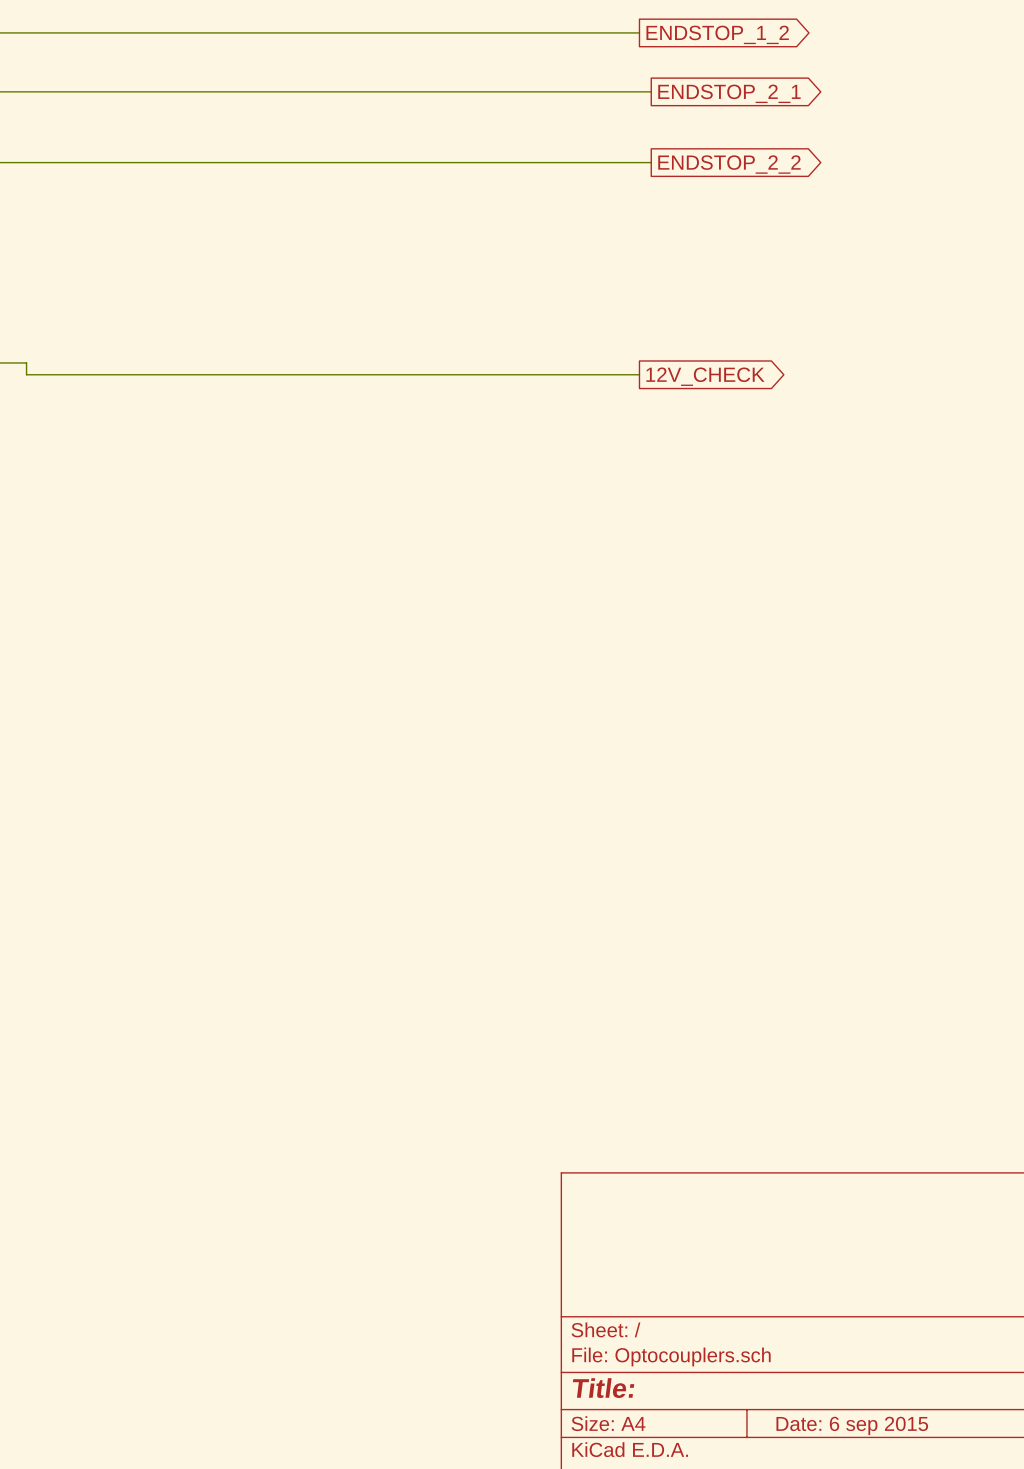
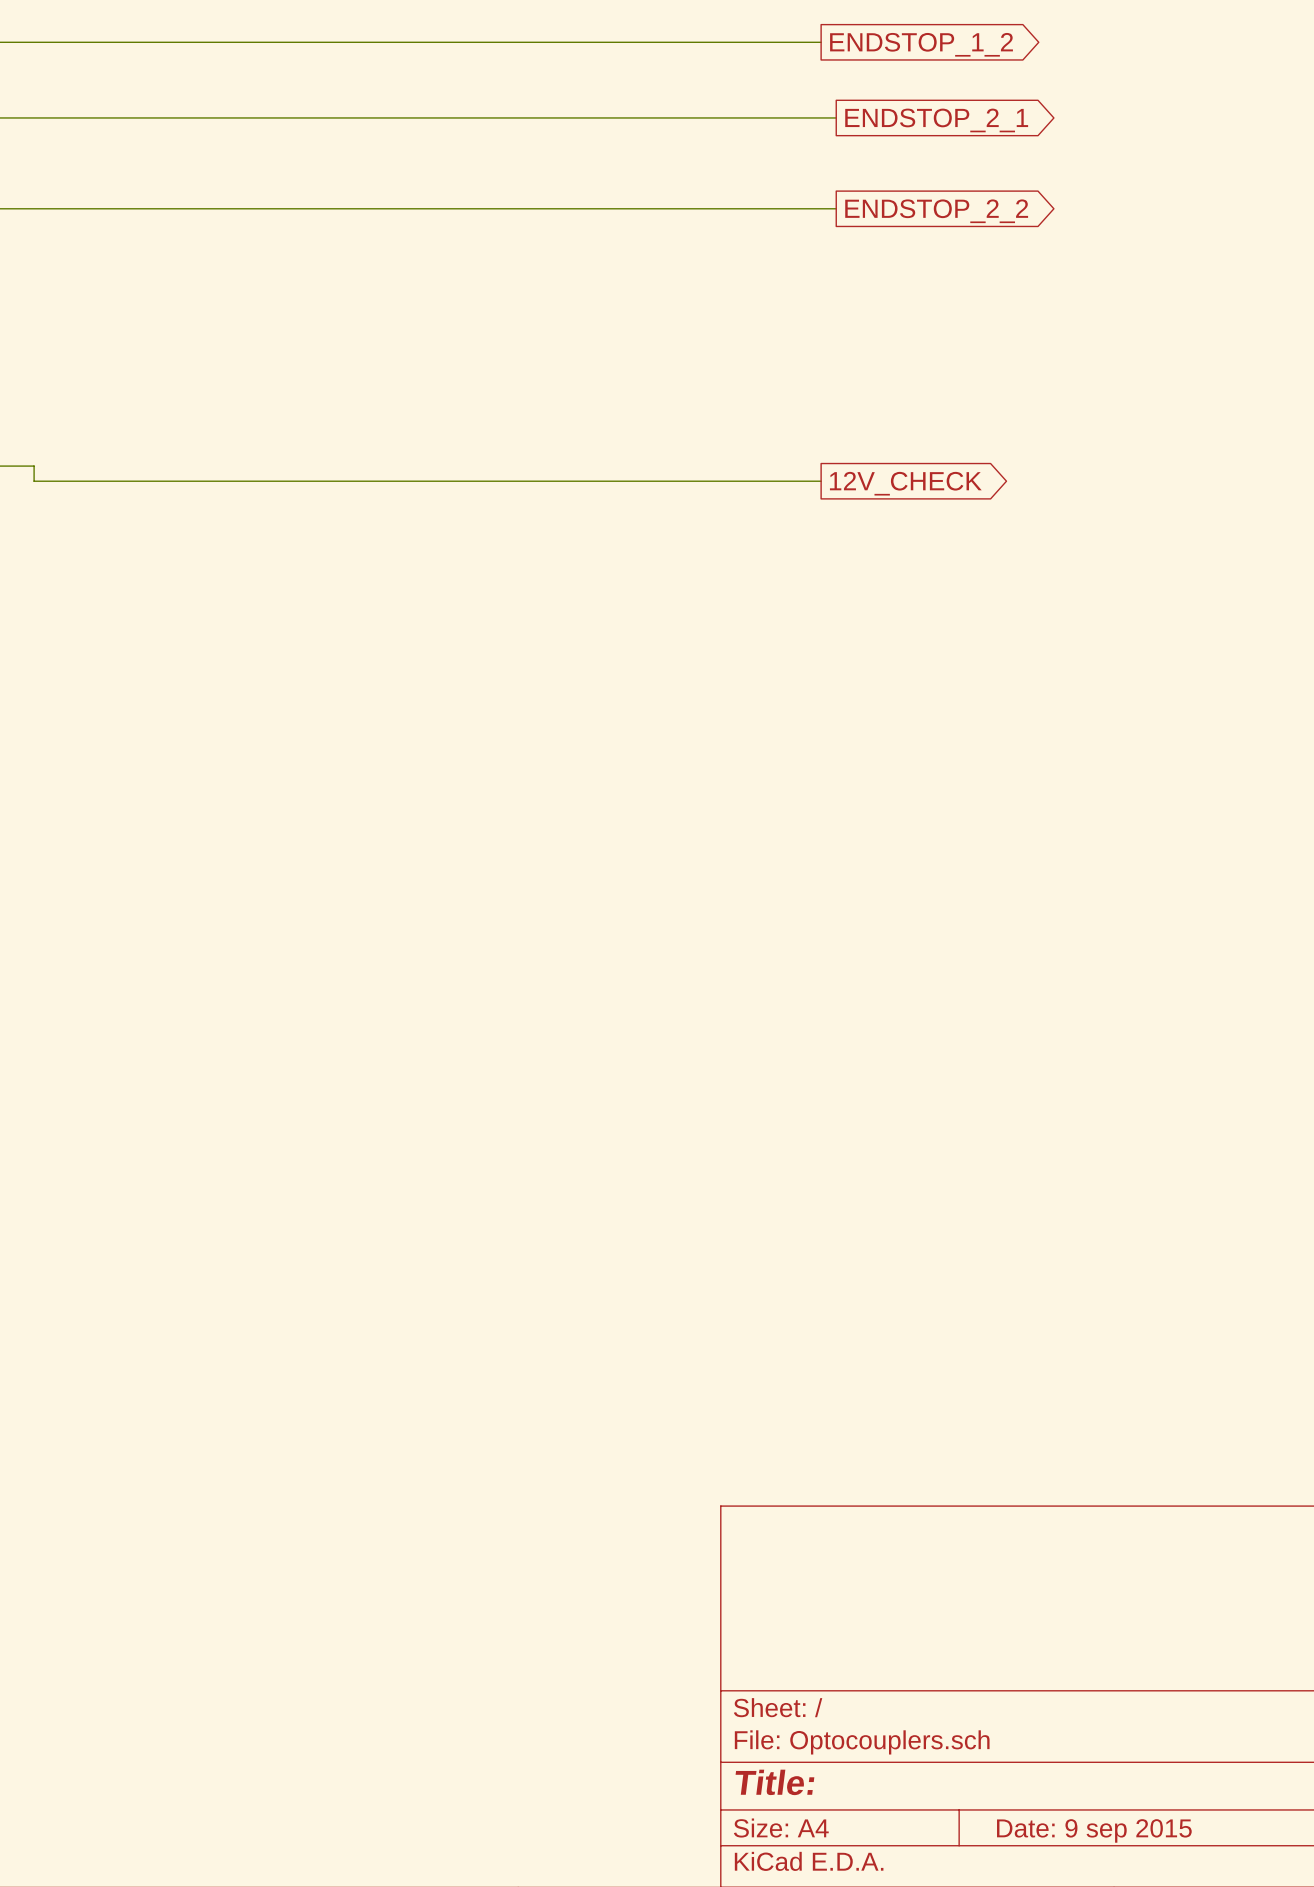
title block: Date: 6 sep 2015 (852, 1425) -> Date: 9 sep 2015 (1094, 1830)

